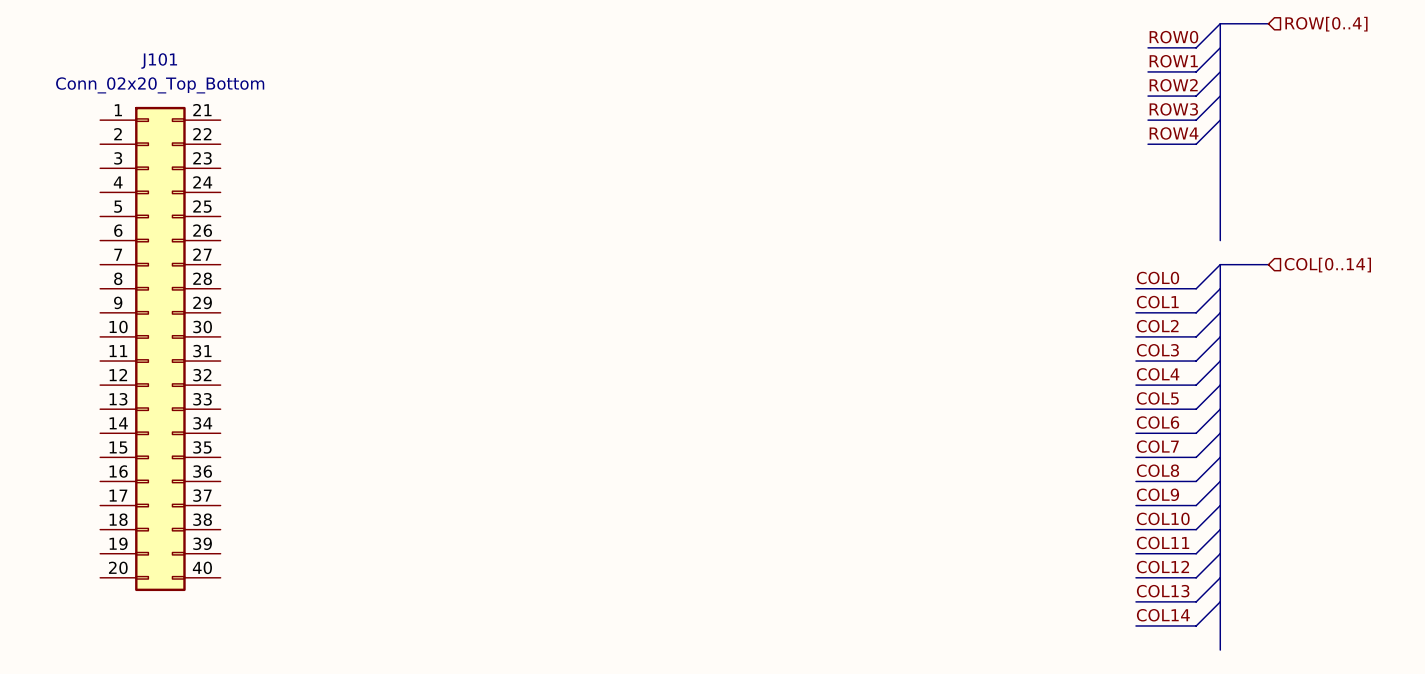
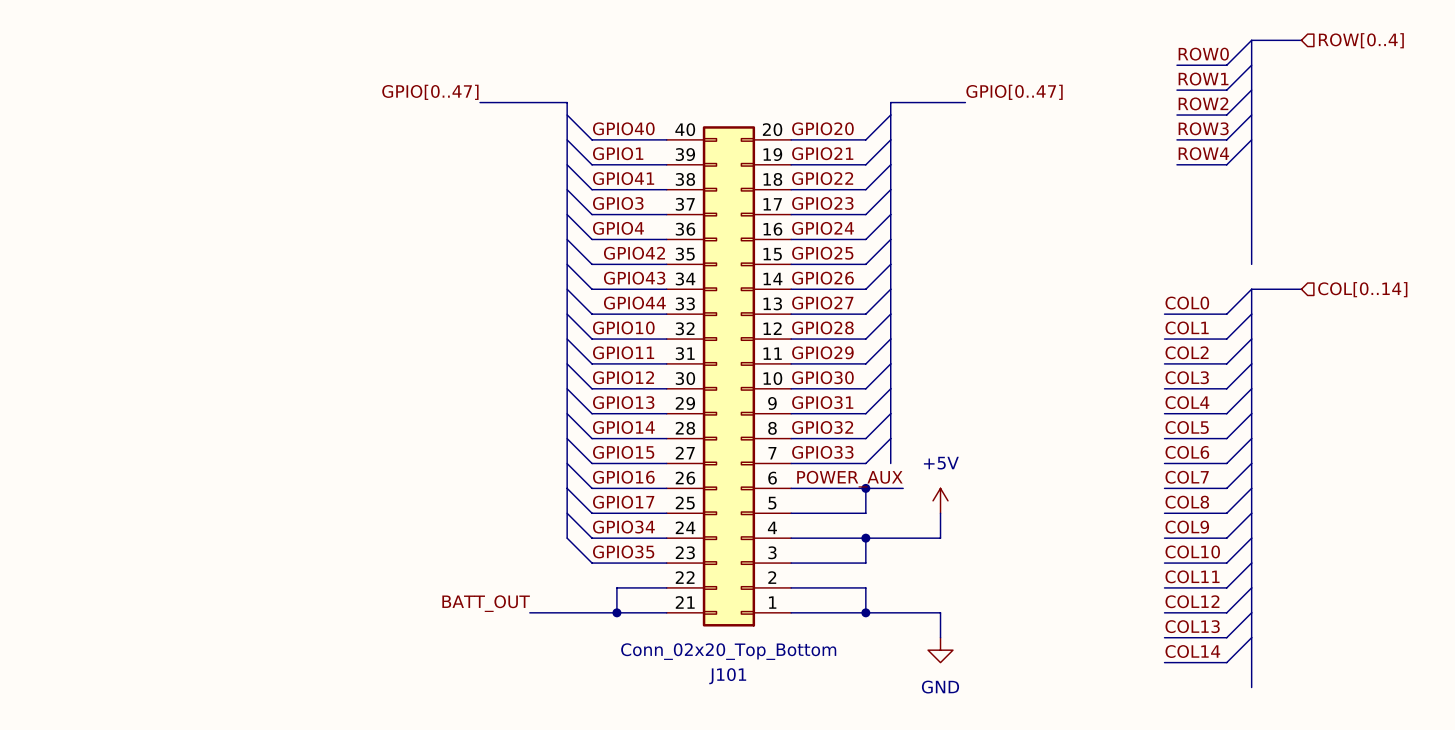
label: none -> GPIO[0..47] (430, 92)
label: none -> GPIO[0..47] (1014, 92)
bus: none -> (480, 102) (567, 102) (567, 538)
bus: none -> (965, 102) (890, 102) (890, 463)
wire: none -> (567, 115) (592, 139) (666, 139)
wire: none -> (890, 115) (865, 139) (791, 139)
label: none -> GPIO40 (623, 128)
label: none -> GPIO20 (822, 128)
wire: none -> (567, 139) (592, 164) (666, 164)
wire: none -> (890, 139) (865, 164) (791, 164)
label: none -> GPIO1 (618, 153)
label: none -> GPIO21 (822, 153)
wire: none -> (567, 164) (592, 189) (666, 189)
wire: none -> (890, 164) (865, 189) (791, 189)
label: none -> GPIO41 (623, 178)
label: none -> GPIO22 (822, 178)
wire: none -> (567, 189) (592, 214) (666, 214)
wire: none -> (890, 189) (865, 214) (791, 214)
label: none -> GPIO3 (618, 203)
label: none -> GPIO23 (822, 203)
wire: none -> (567, 214) (592, 239) (666, 239)
wire: none -> (890, 214) (865, 239) (791, 239)
label: none -> GPIO4 (618, 228)
label: none -> GPIO24 (823, 228)
wire: none -> (567, 239) (592, 264) (666, 264)
wire: none -> (890, 239) (865, 264) (791, 264)
label: none -> GPIO42 (634, 253)
label: none -> GPIO25 (822, 253)
wire: none -> (567, 264) (592, 289) (666, 289)
wire: none -> (890, 264) (865, 289) (791, 289)
label: none -> GPIO43 (634, 278)
label: none -> GPIO26 (822, 278)
wire: none -> (567, 289) (592, 314) (666, 314)
wire: none -> (890, 289) (865, 314) (791, 314)
label: none -> GPIO44 (634, 303)
label: none -> GPIO27 (822, 303)
wire: none -> (567, 314) (592, 339) (666, 339)
wire: none -> (890, 314) (865, 339) (791, 339)
label: none -> GPIO10 (623, 327)
label: none -> GPIO28 (822, 327)
wire: none -> (567, 339) (592, 363) (666, 363)
wire: none -> (890, 339) (865, 363) (791, 363)
label: none -> GPIO11 (623, 352)
label: none -> GPIO29 (822, 352)
wire: none -> (567, 363) (592, 388) (666, 388)
wire: none -> (890, 363) (865, 388) (791, 388)
J101 rotation: 0° (160, 348) -> 180° (728, 376)
J101 position: (160, 348) -> (728, 376)
label: none -> GPIO12 (623, 377)
label: none -> GPIO30 (822, 377)
wire: none -> (567, 388) (592, 413) (666, 413)
wire: none -> (890, 388) (865, 413) (791, 413)
label: none -> GPIO13 (623, 402)
label: none -> GPIO31 (822, 402)
wire: none -> (567, 413) (592, 438) (666, 438)
wire: none -> (890, 413) (865, 438) (791, 438)
label: none -> GPIO14 (623, 427)
label: none -> GPIO32 (822, 427)
wire: none -> (567, 438) (592, 463) (666, 463)
wire: none -> (890, 438) (865, 463) (791, 463)
label: none -> GPIO15 (623, 452)
label: none -> GPIO33 (822, 452)
wire: none -> (567, 463) (592, 488) (666, 488)
label: none -> GPIO16 (623, 477)
label: none -> POWER_AUX (849, 479)
wire: none -> (567, 488) (592, 513) (666, 513)
wire: none -> (791, 488) (903, 488)
wire: none -> (865, 488) (865, 513) (791, 513)
junction: none -> (865, 488)
power symbol: none -> +5V (940, 500)
label: none -> GPIO17 (623, 502)
wire: none -> (567, 513) (592, 538) (666, 538)
wire: none -> (940, 513) (940, 538) (791, 538)
label: none -> GPIO34 (623, 527)
wire: none -> (567, 538) (592, 563) (666, 563)
wire: none -> (865, 538) (865, 563) (791, 563)
junction: none -> (865, 538)
label: none -> GPIO35 (623, 551)
wire: none -> (666, 587) (616, 587) (616, 612)
wire: none -> (791, 587) (865, 587) (865, 612)
label: none -> BATT_OUT (486, 603)
wire: none -> (529, 612) (666, 612)
junction: none -> (616, 612)
wire: none -> (791, 612) (940, 612) (940, 637)
junction: none -> (865, 612)
power symbol: none -> GND (940, 650)

